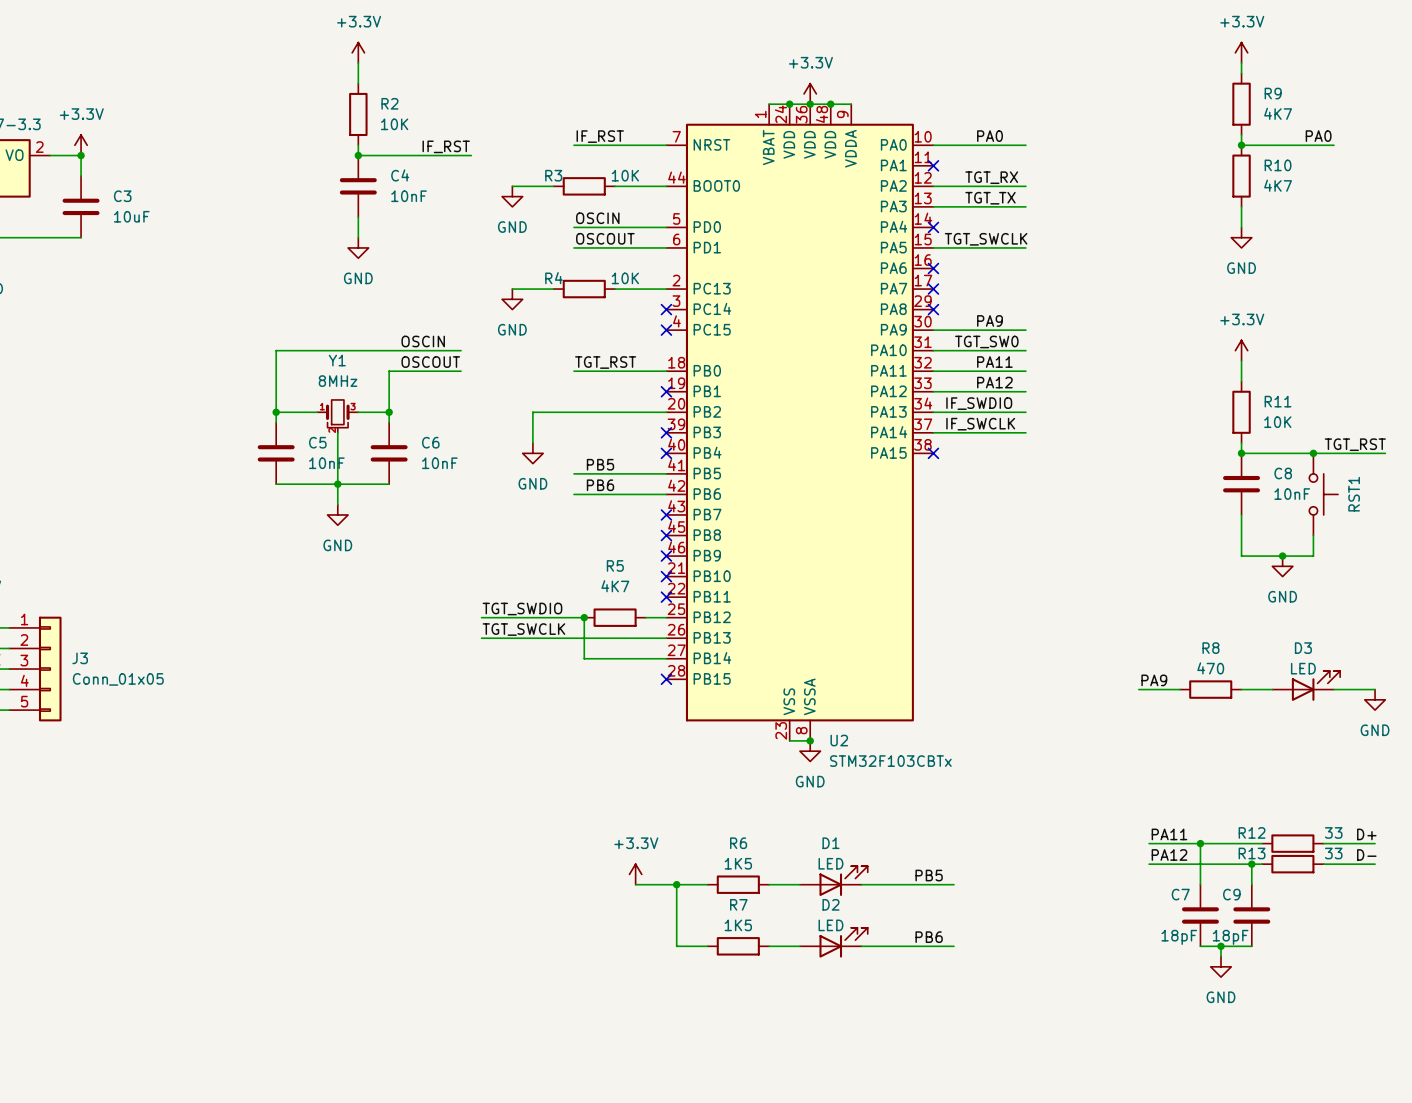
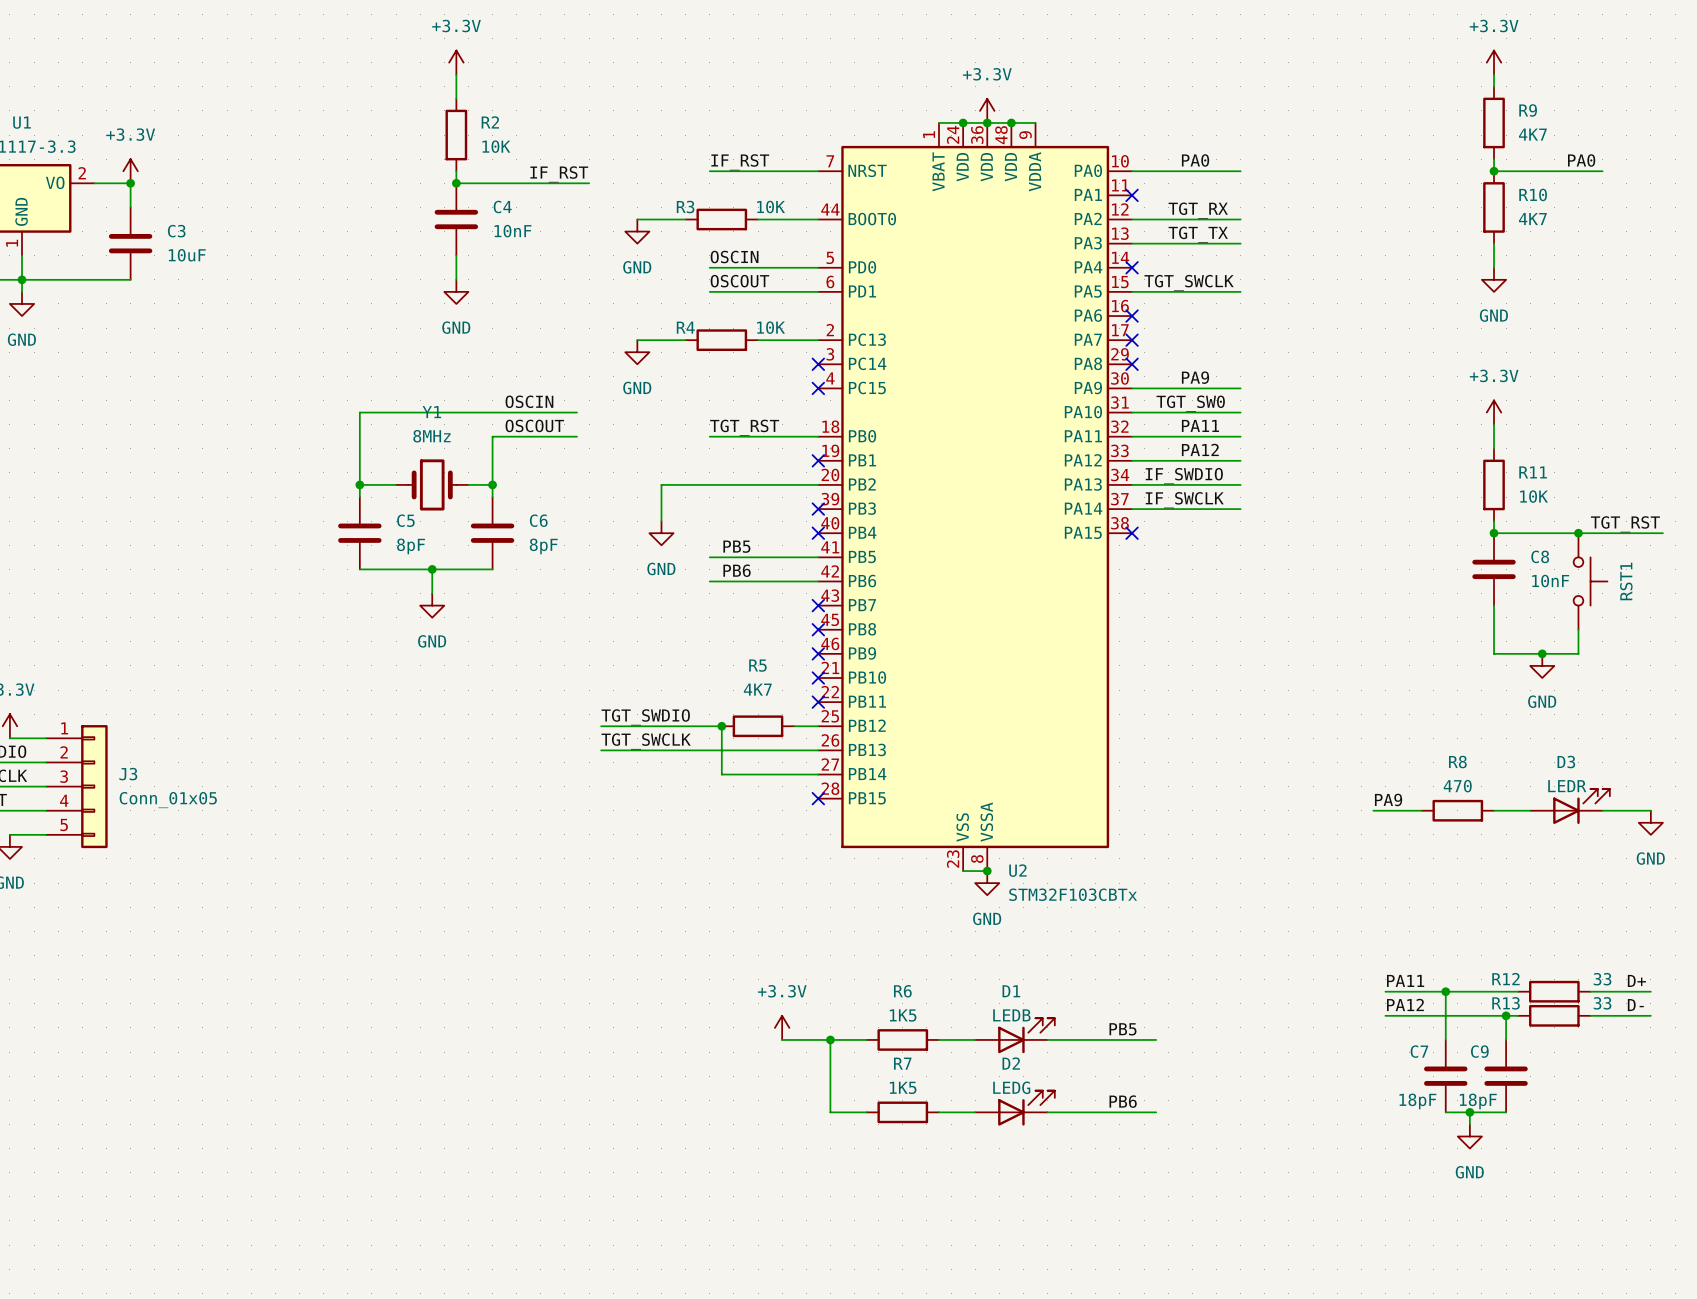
Y1 symbol: [317, 399, 359, 433] -> [396, 459, 469, 511]
wire: (337, 432) (337, 484) -> none
C5 value: 10nF (326, 463) -> 8pF (411, 546)
C6 value: 10nF (439, 463) -> 8pF (543, 546)
D3 value: LED (1303, 668) -> LEDR (1567, 786)
D1 value: LED (830, 863) -> LEDB (1011, 1015)
D2 value: LED (830, 925) -> LEDG (1011, 1087)

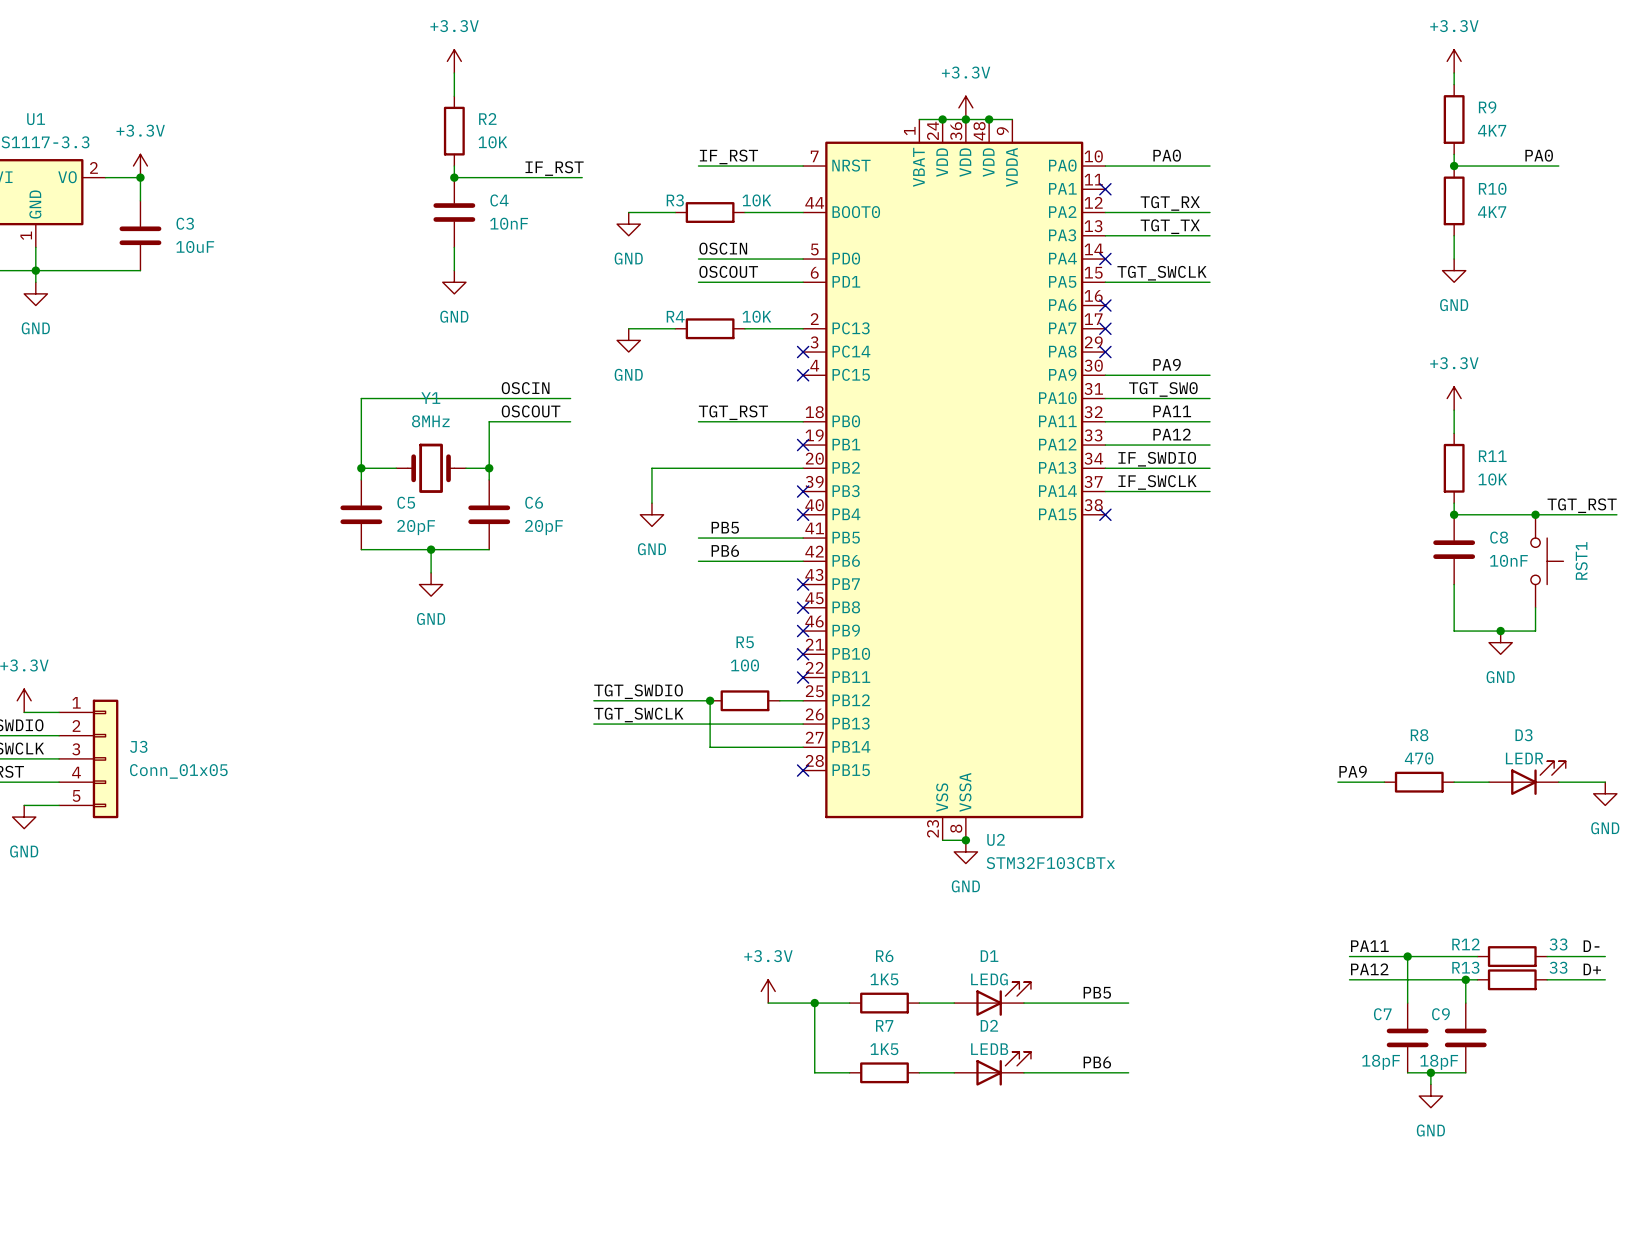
C5 value: 8pF (411, 546) -> 20pF (416, 527)
C6 value: 8pF (543, 546) -> 20pF (544, 527)
R5 value: 4K7 (757, 689) -> 100 (744, 665)
label: D+ (1636, 980) -> D- (1591, 946)
label: D- (1635, 1005) -> D+ (1592, 969)
D1 value: LEDB (1011, 1015) -> LEDG (989, 979)
D2 value: LEDG (1011, 1087) -> LEDB (989, 1049)

